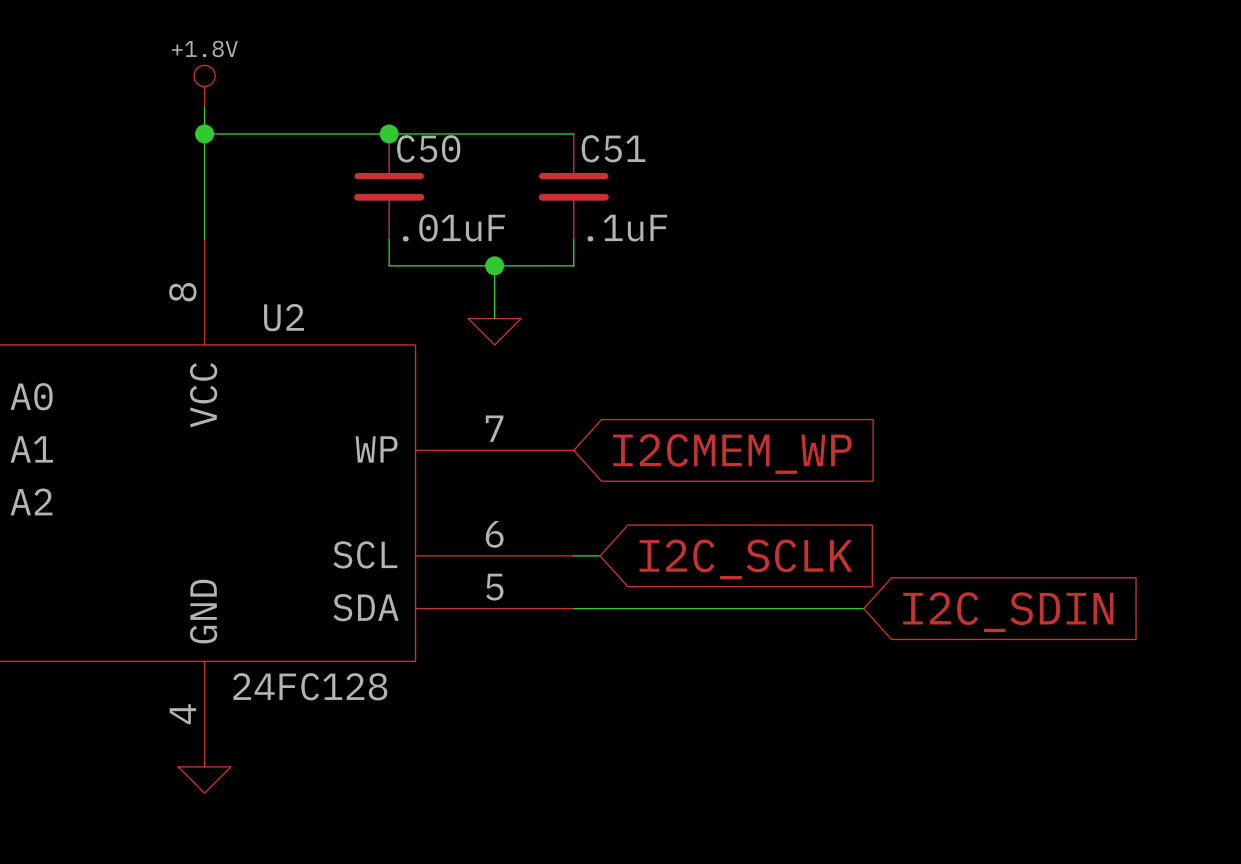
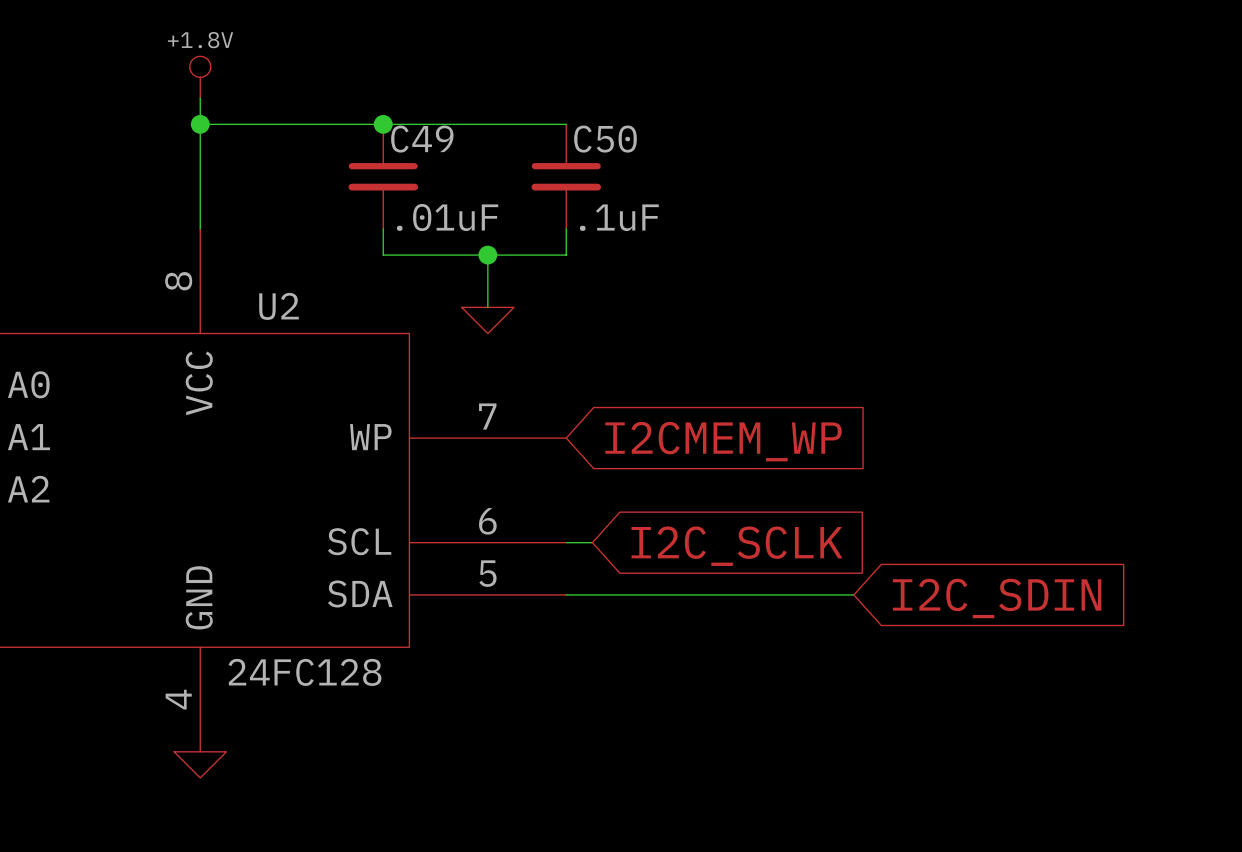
C50 name: C50 (428, 148) -> C49 (422, 139)
C51 name: C51 (613, 148) -> C50 (605, 139)

